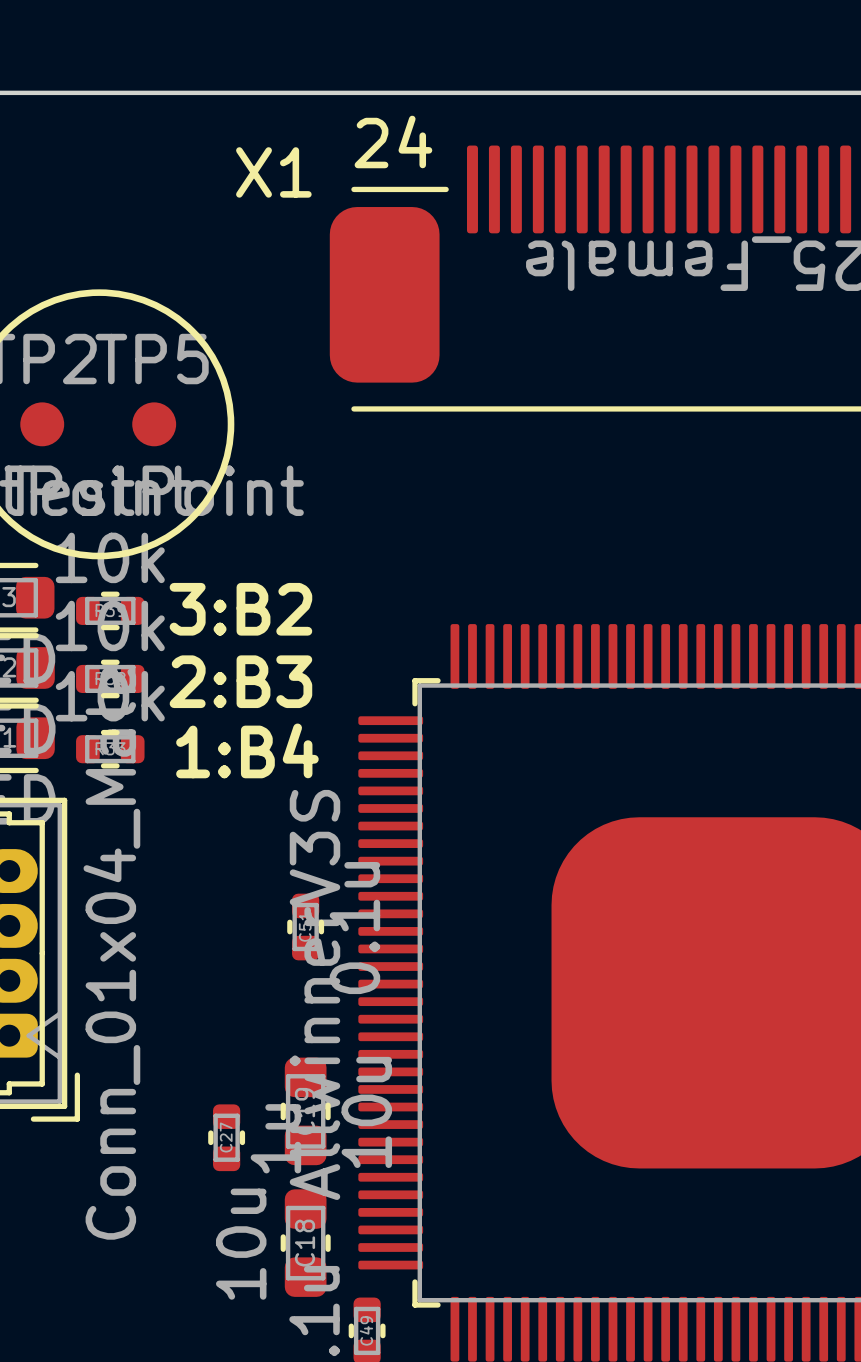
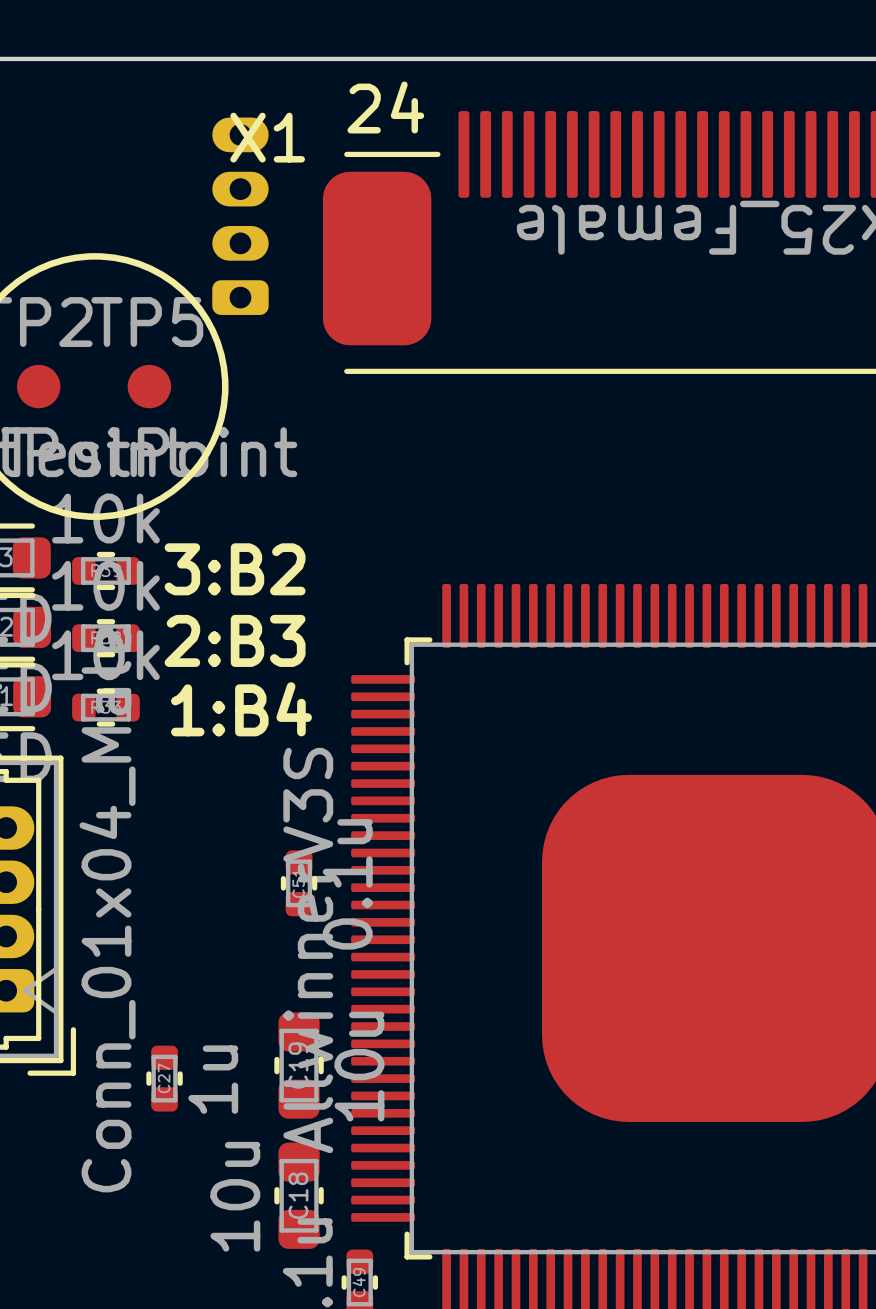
part: none -> (240, 216)
C27 position: (226, 1137) -> (164, 1078)

